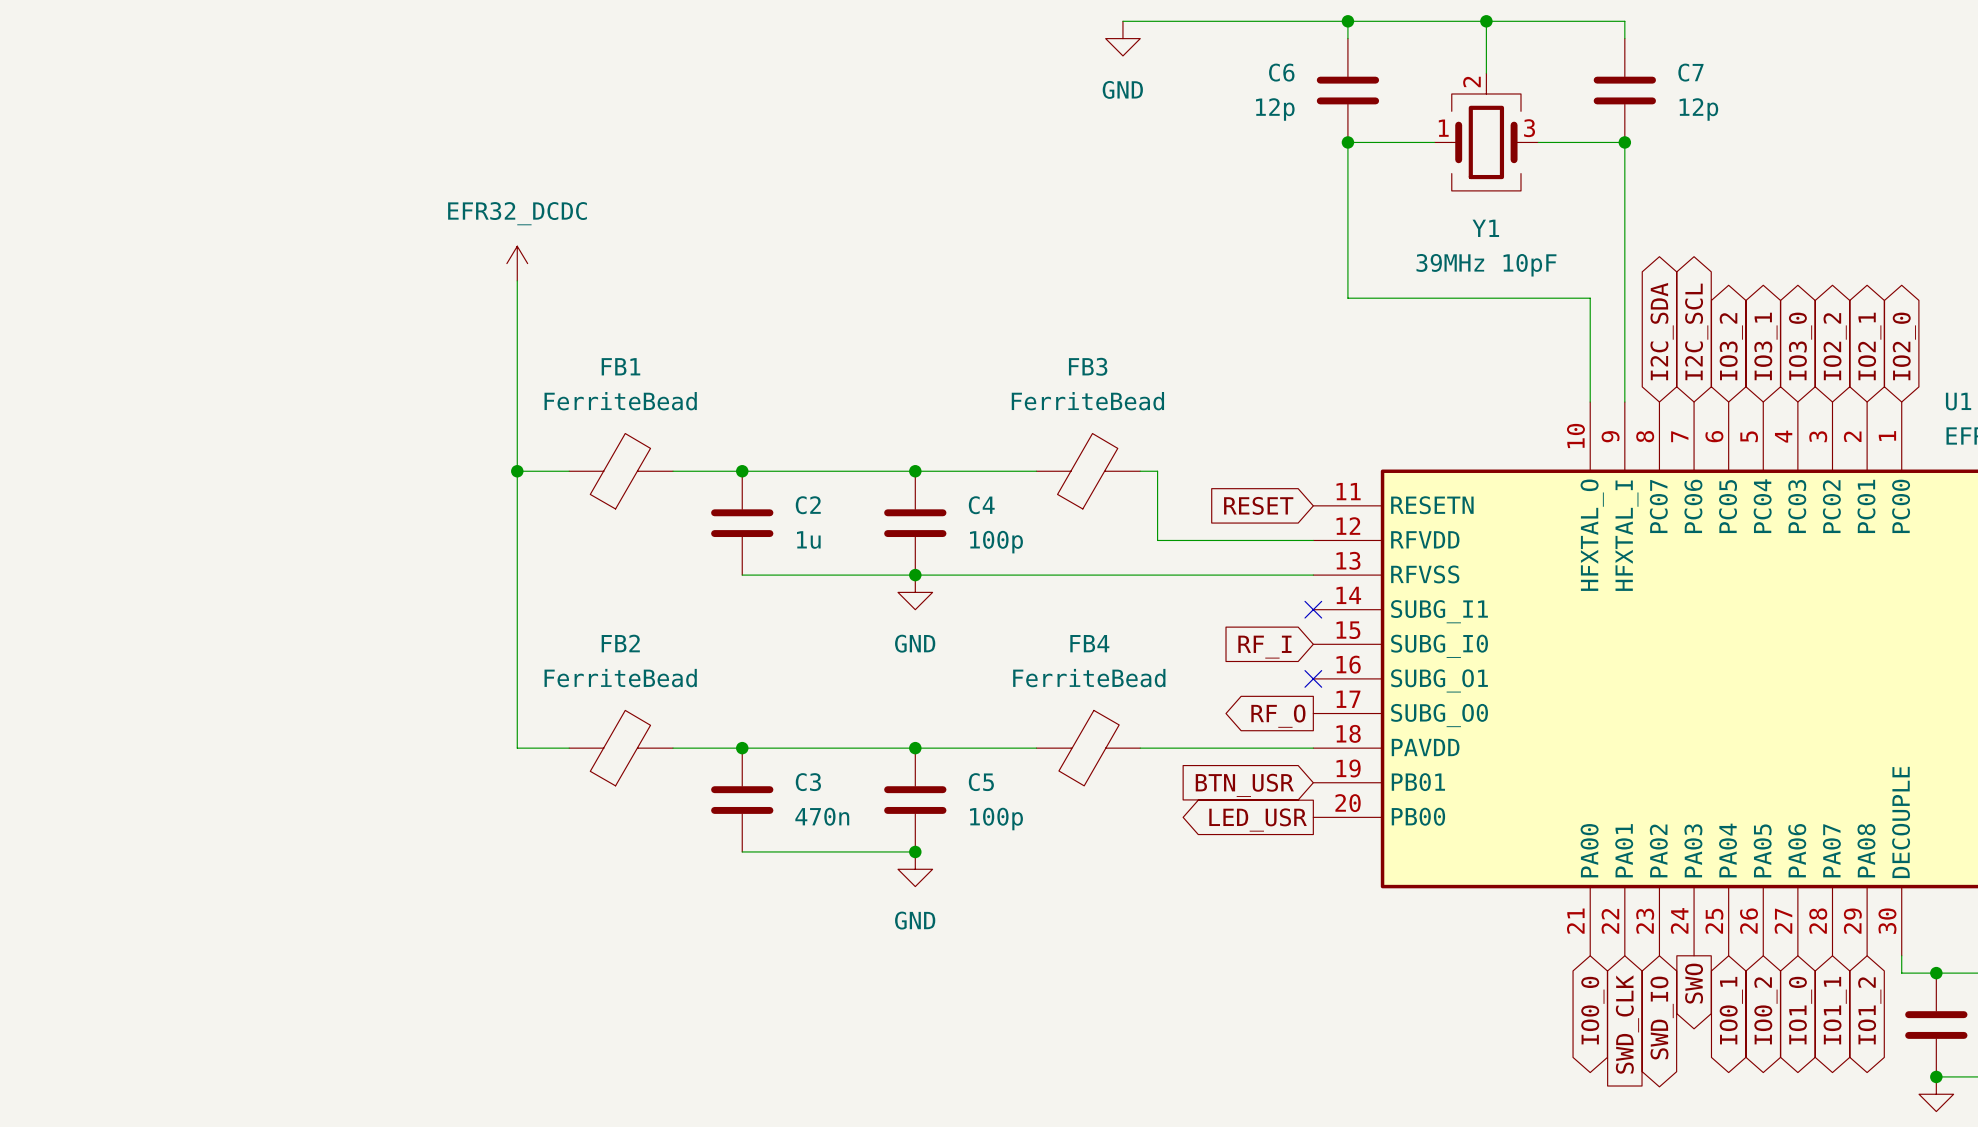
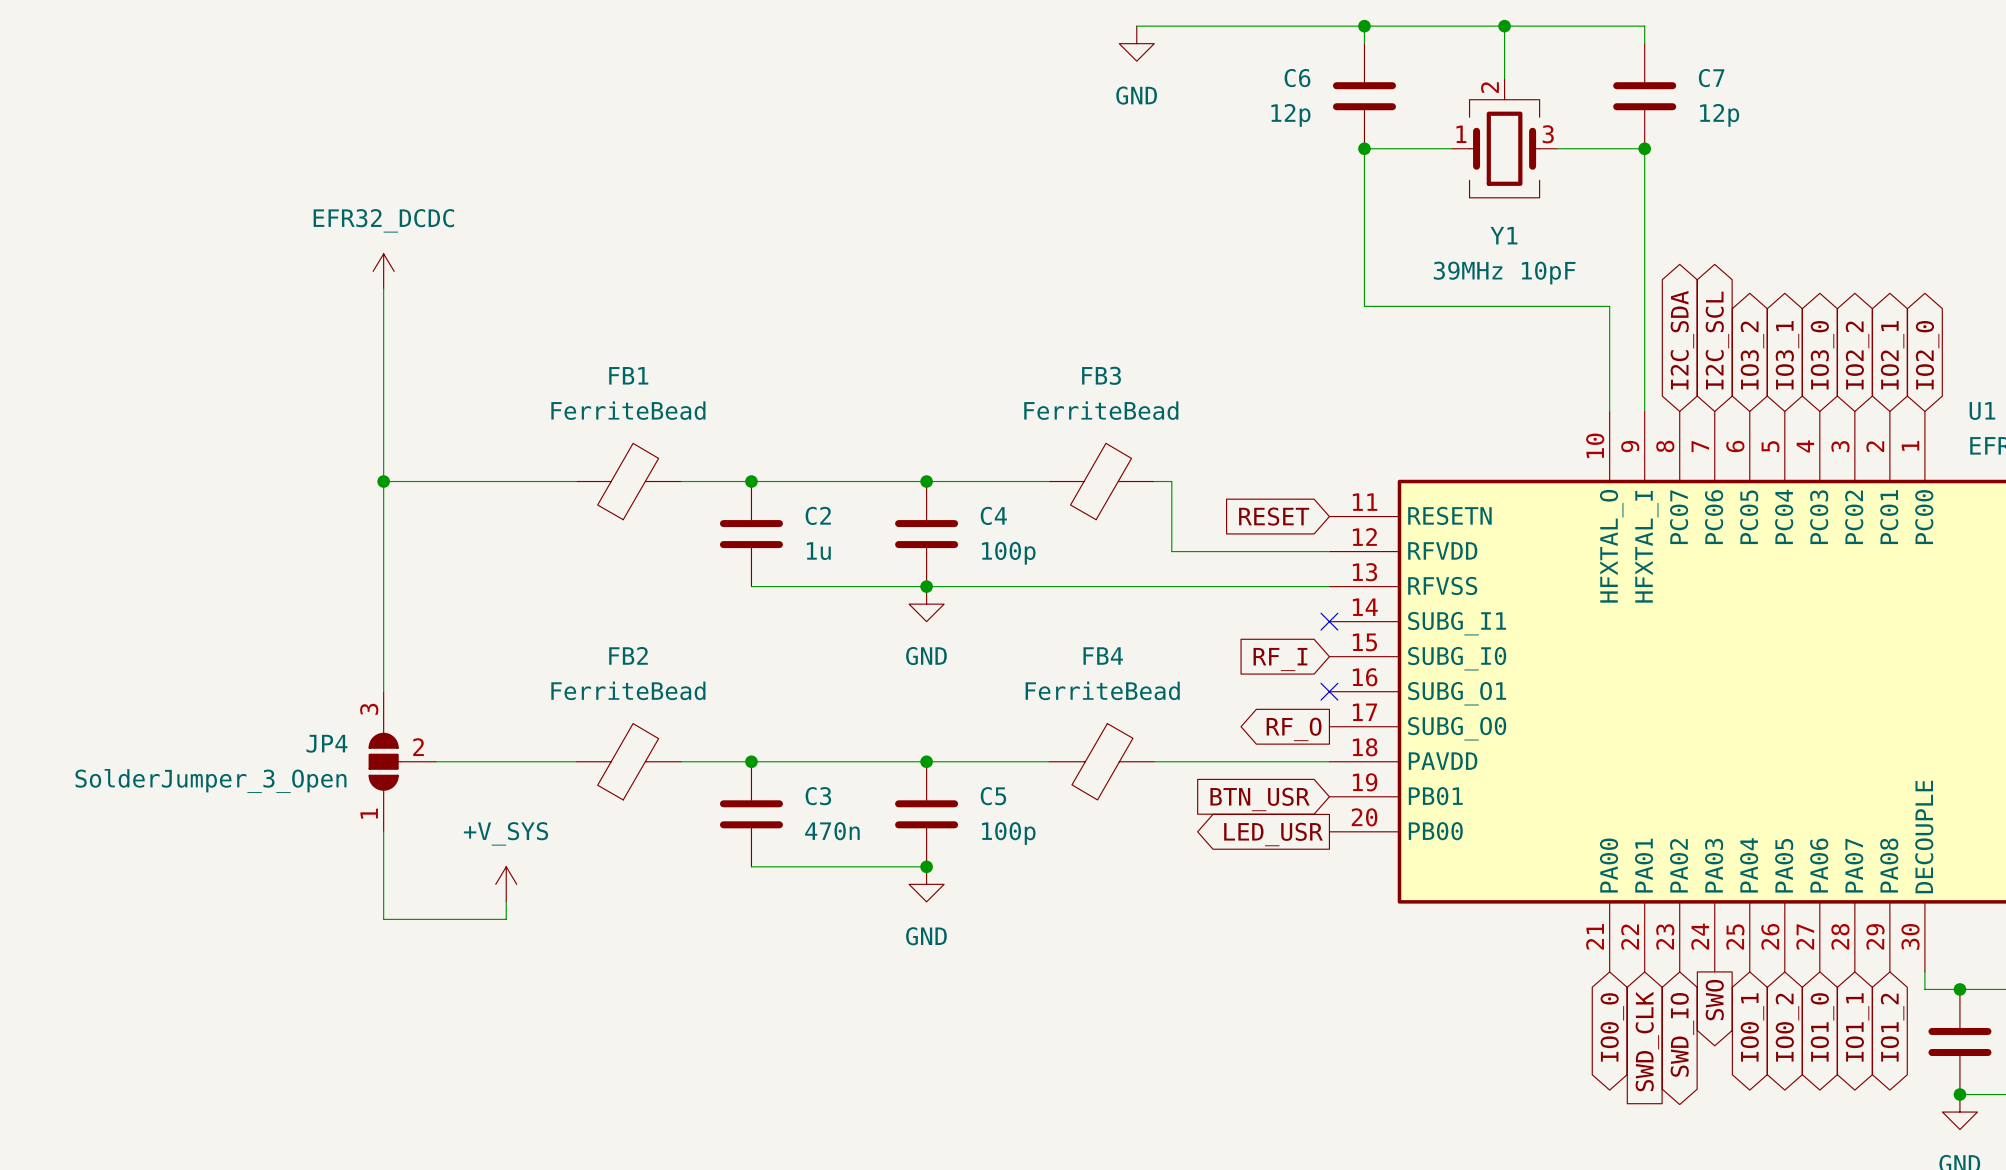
power symbol position: EFR32_DCDC (517, 263) -> EFR32_DCDC (383, 271)
wire: none -> (383, 288) (383, 691)
wire: (517, 280) (517, 748) -> (436, 761) (523, 761)
wire: none -> (383, 481) (523, 481)
junction: none -> (383, 481)
junction: (517, 471) -> none
JP4: none -> SolderJumper_3_Open (402, 761)
wire: none -> (383, 831) (383, 919) (506, 919) (506, 901)
power symbol: none -> +V_SYS (506, 884)

